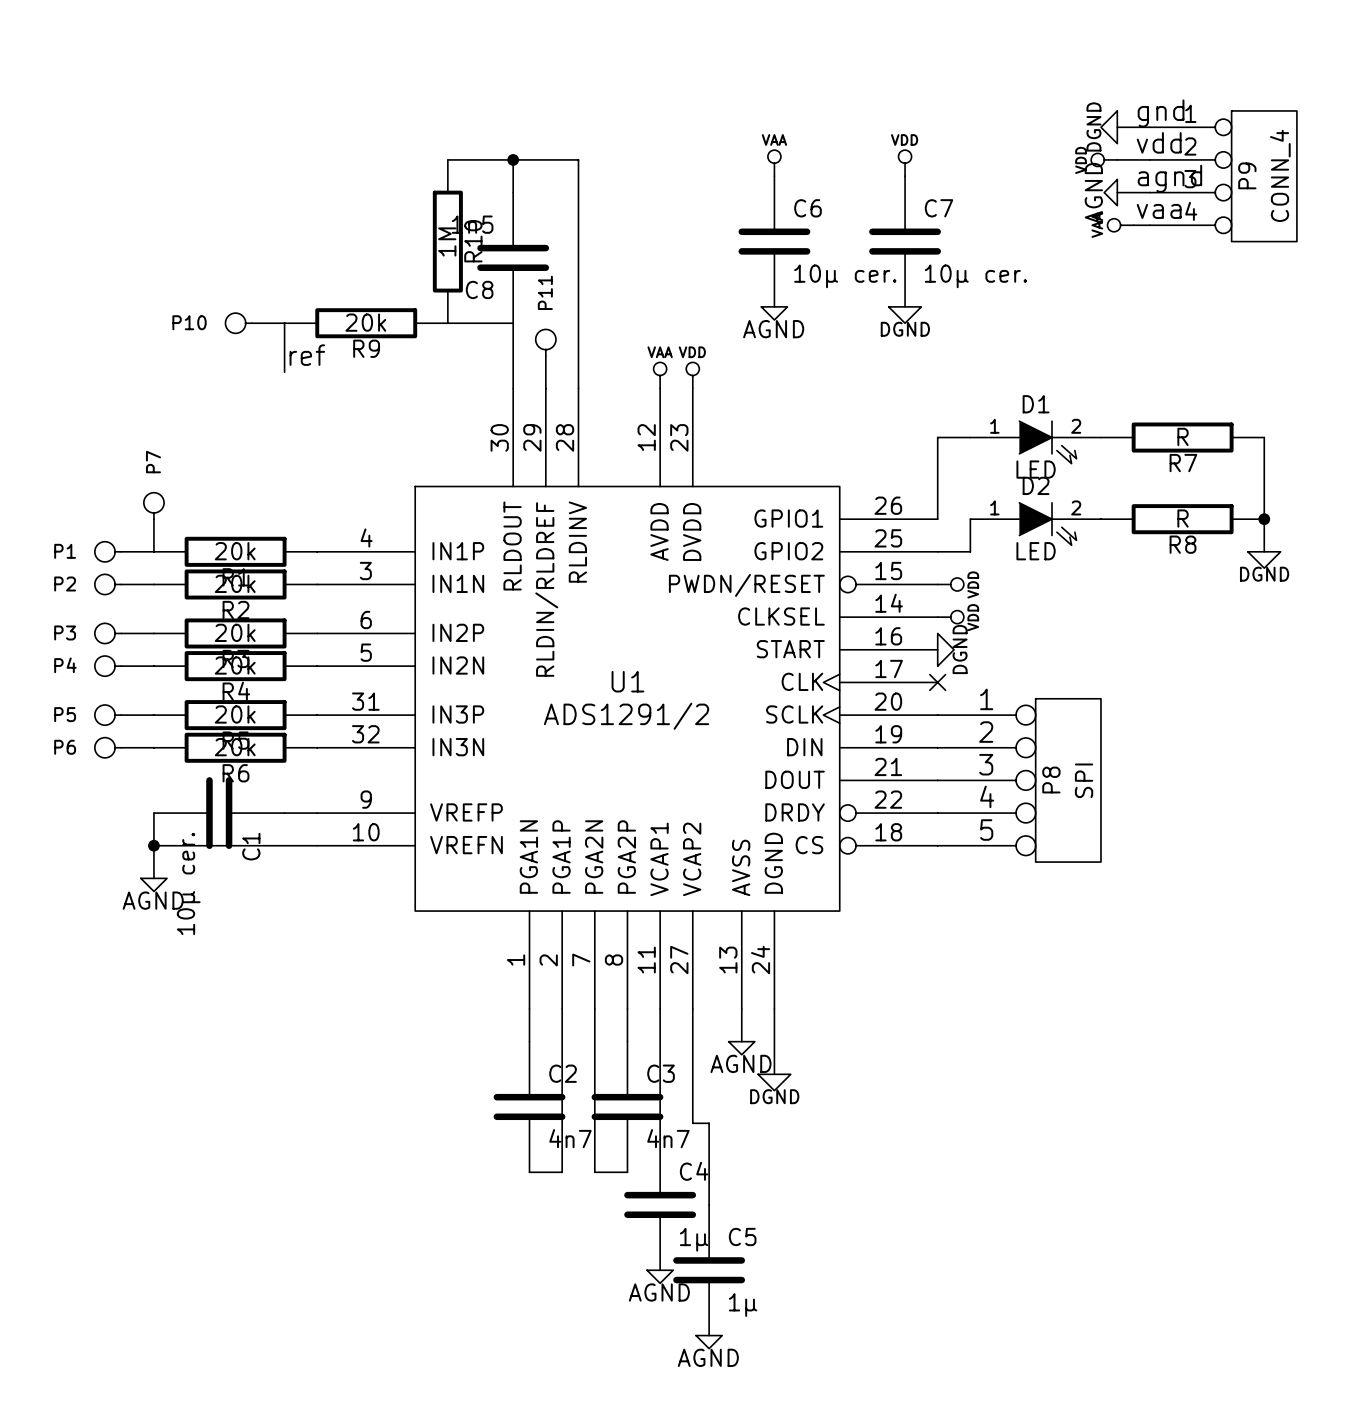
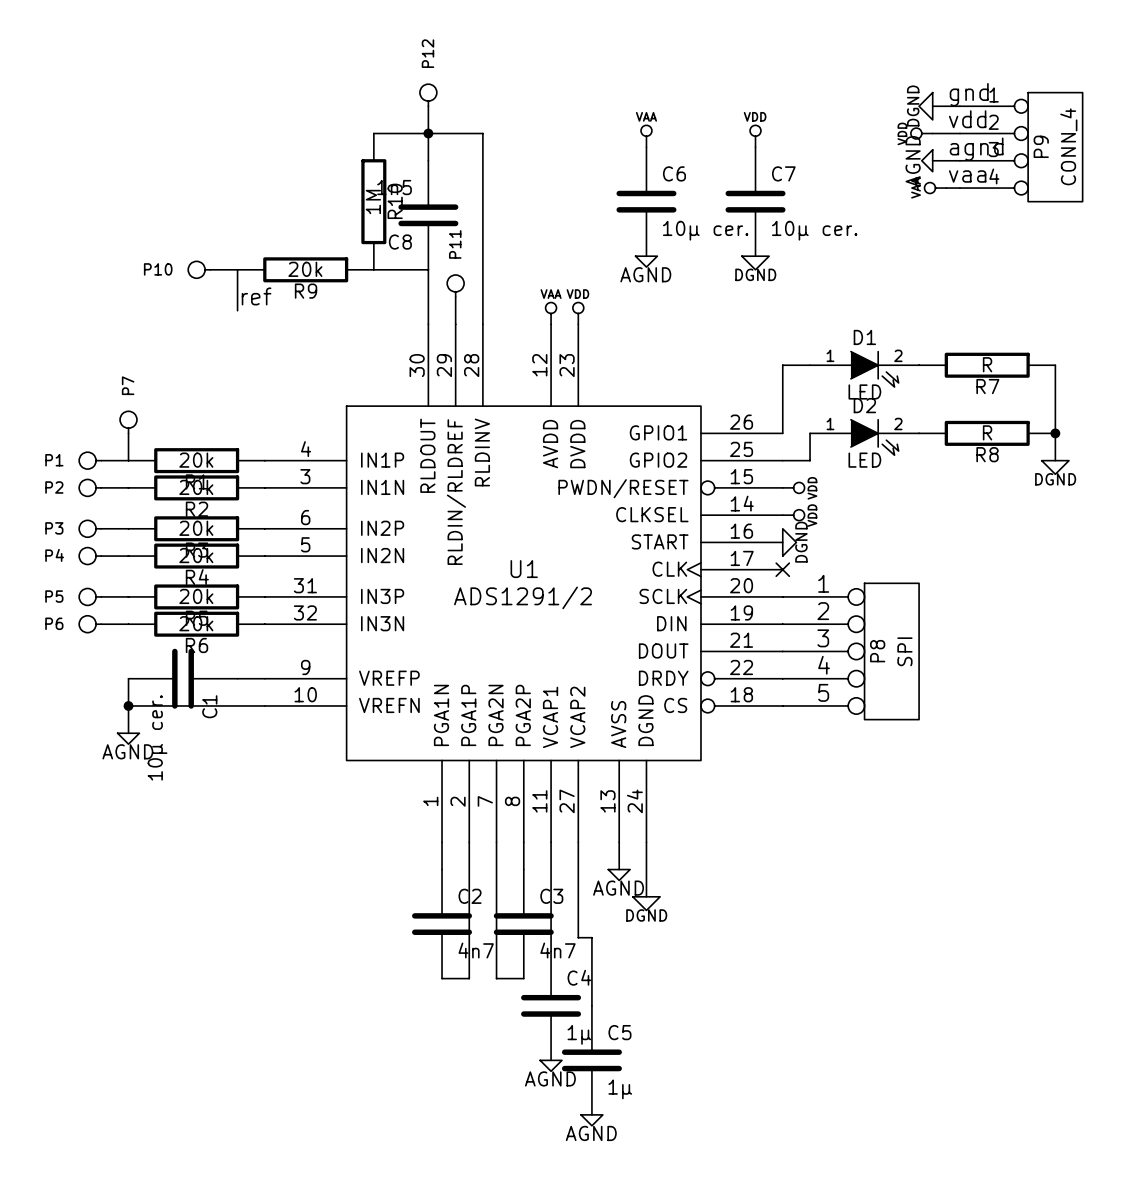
P12: none -> (428, 108)

